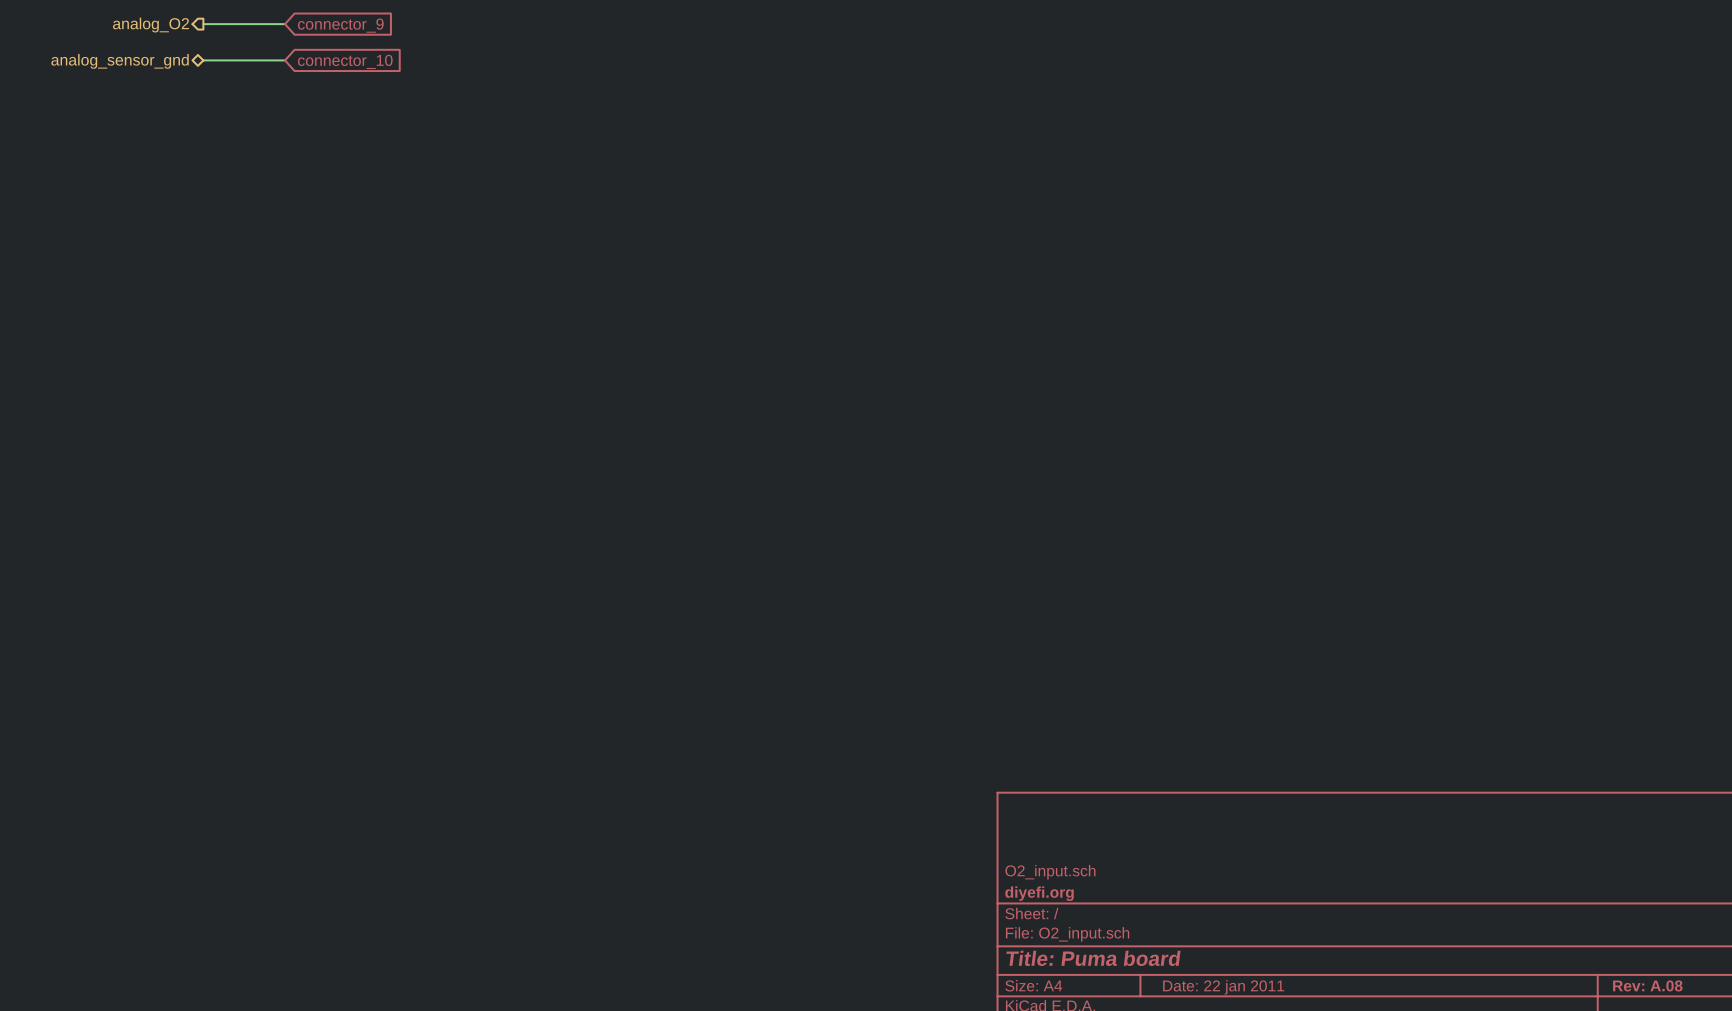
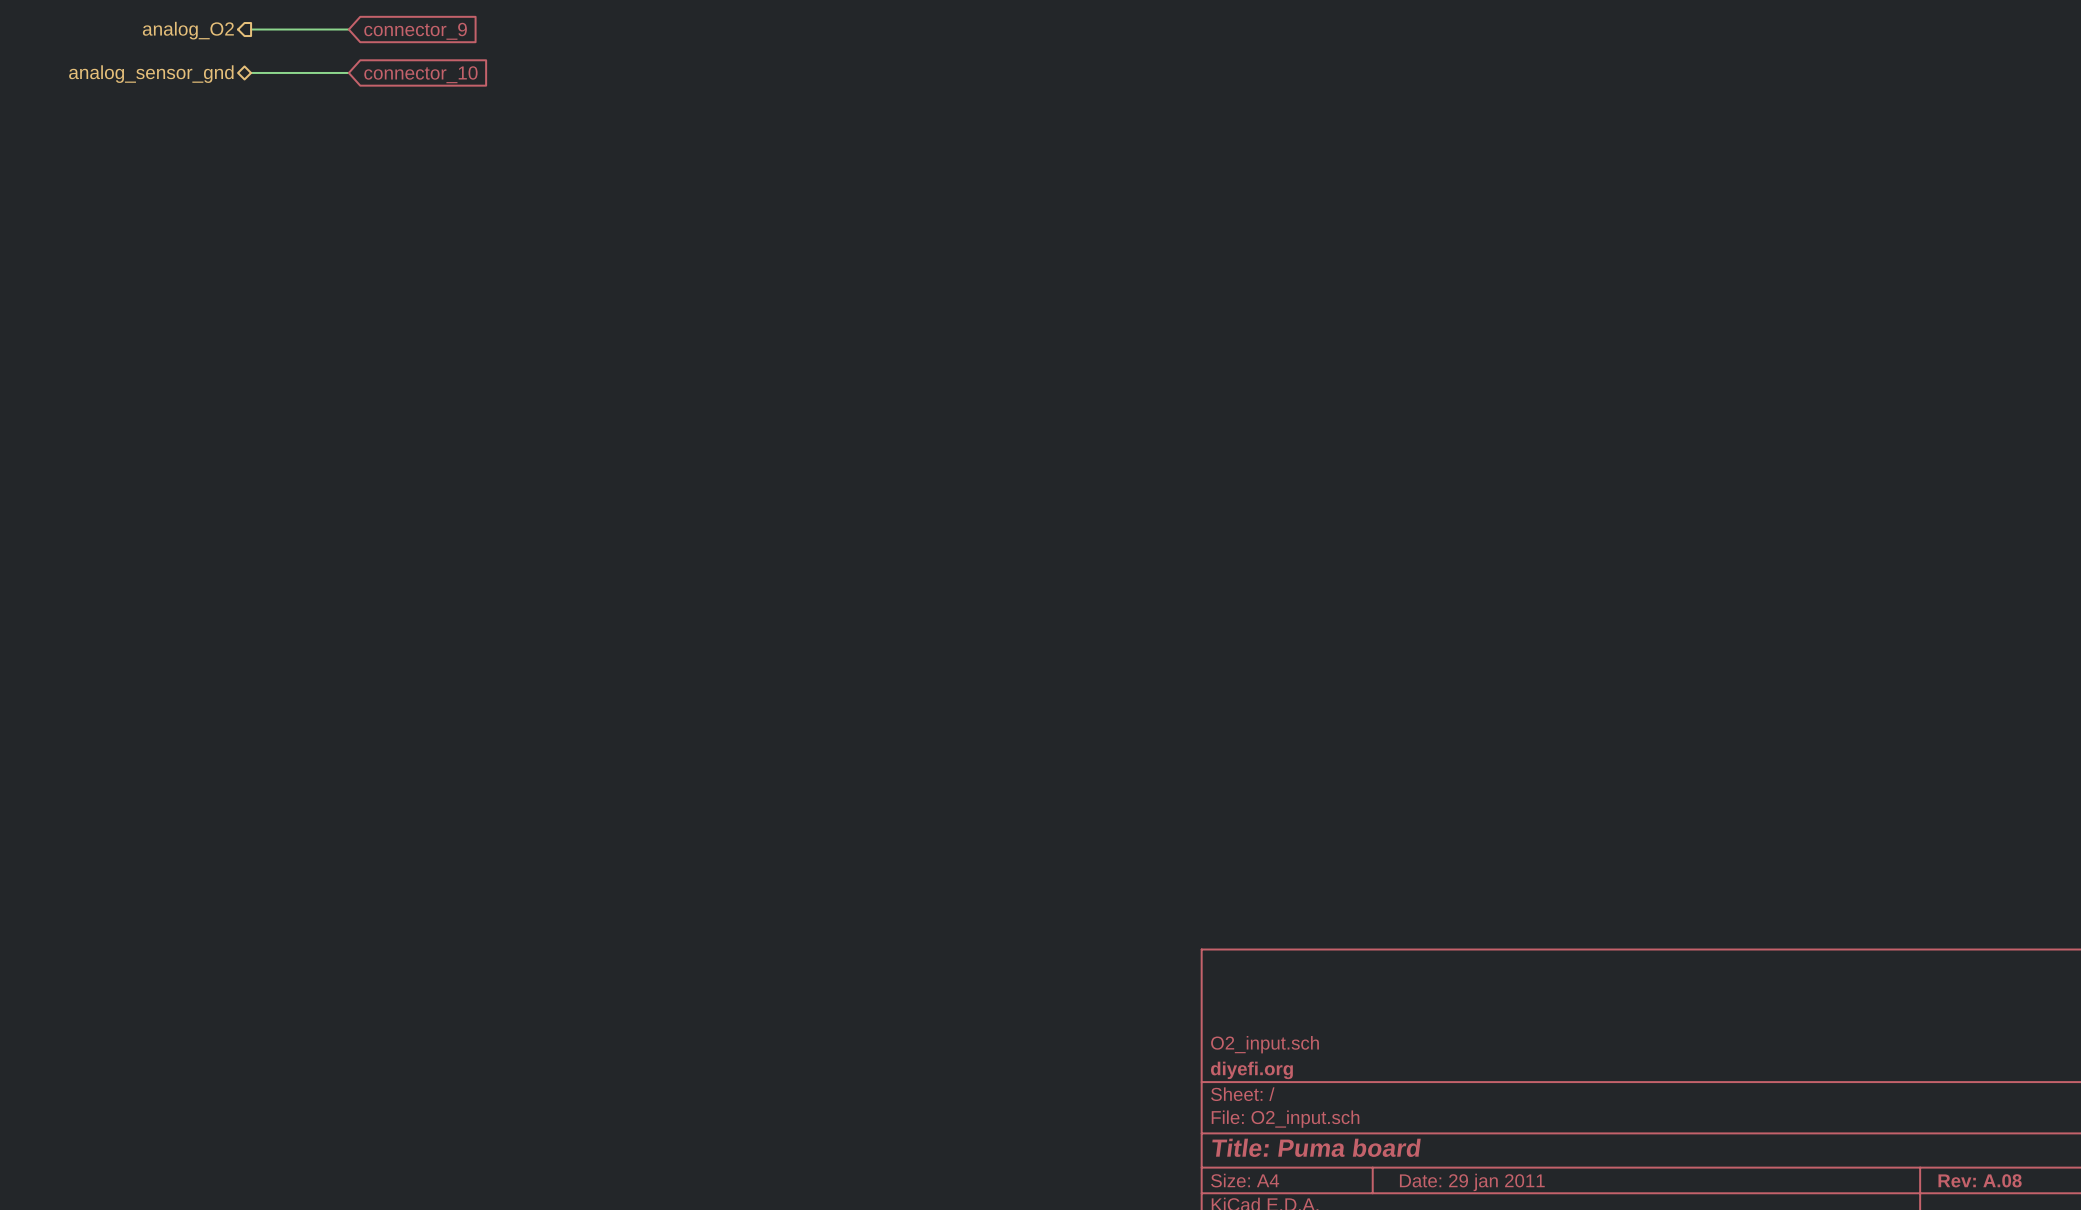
title block: Date: 22 jan 2011 (1223, 987) -> Date: 29 jan 2011 (1472, 1182)

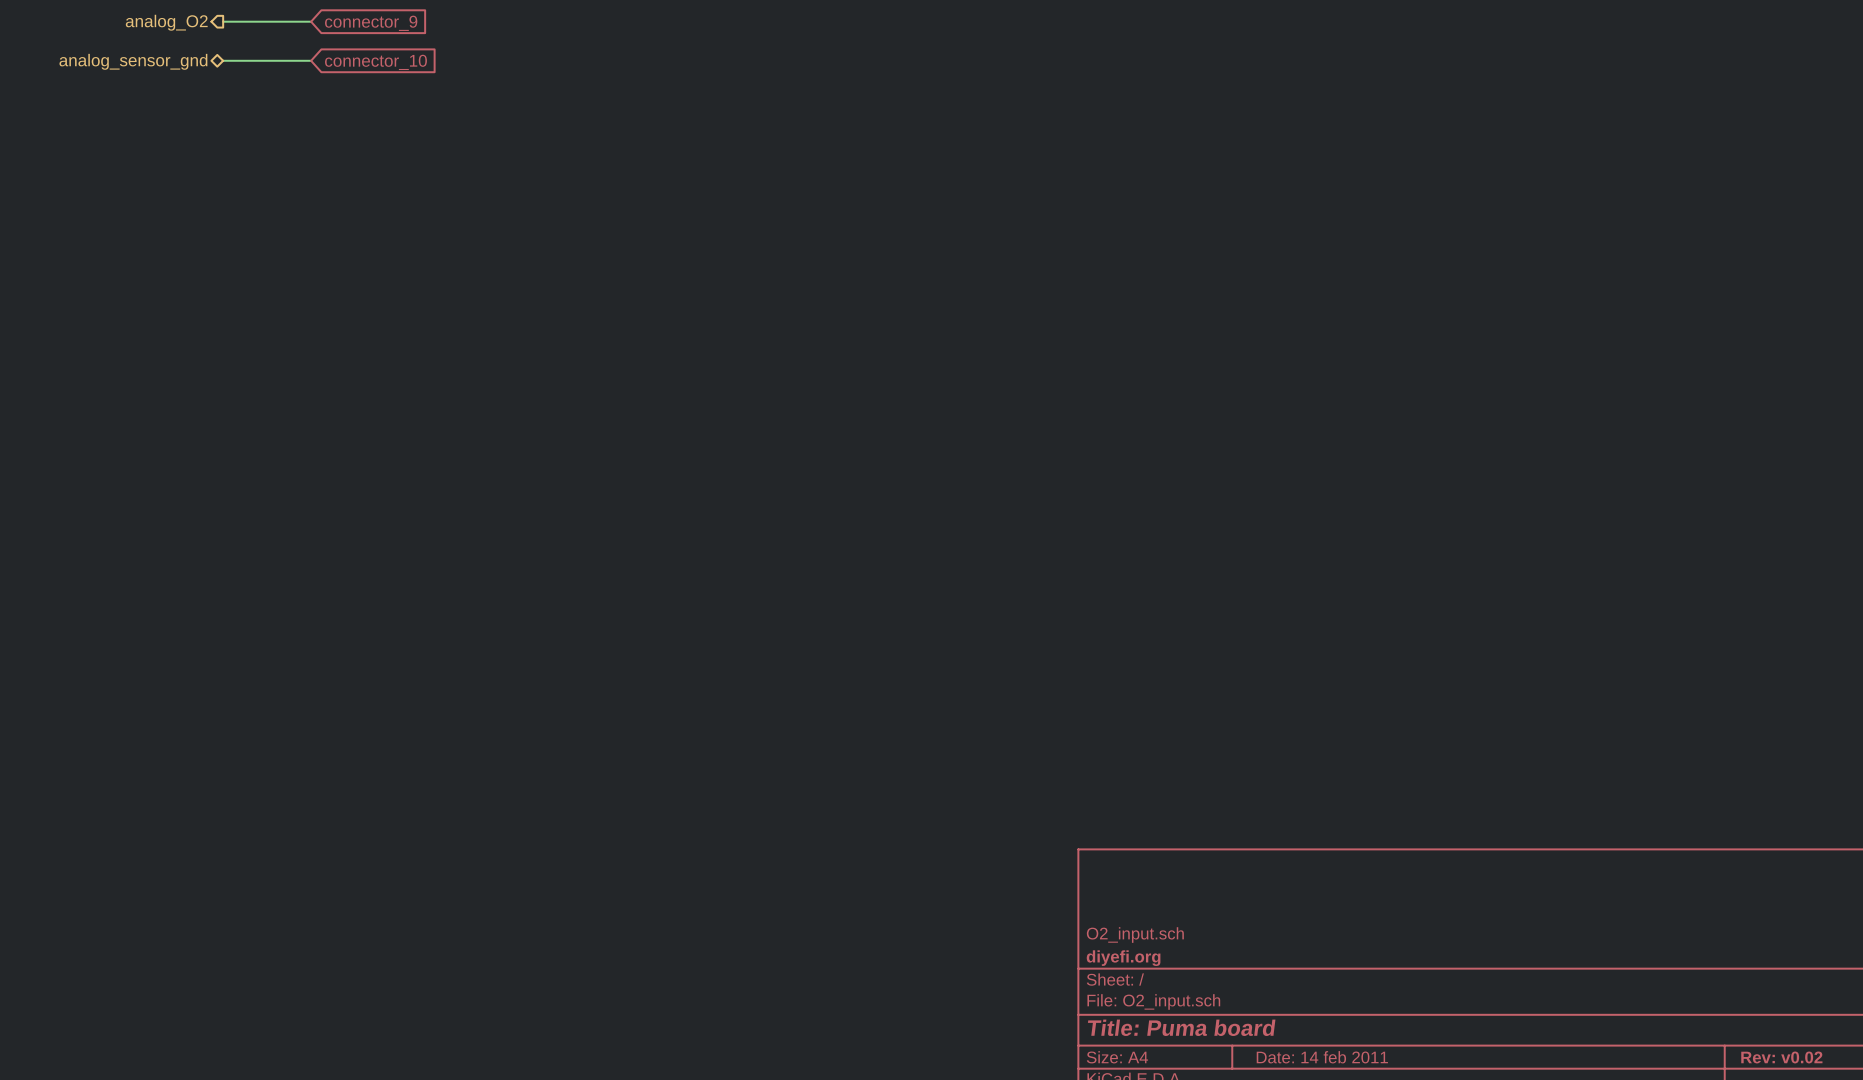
title block: Rev: A.08 (1980, 1180) -> Rev: v0.02 (1781, 1057)
title block: Date: 29 jan 2011 (1472, 1182) -> Date: 14 feb 2011 (1322, 1057)

